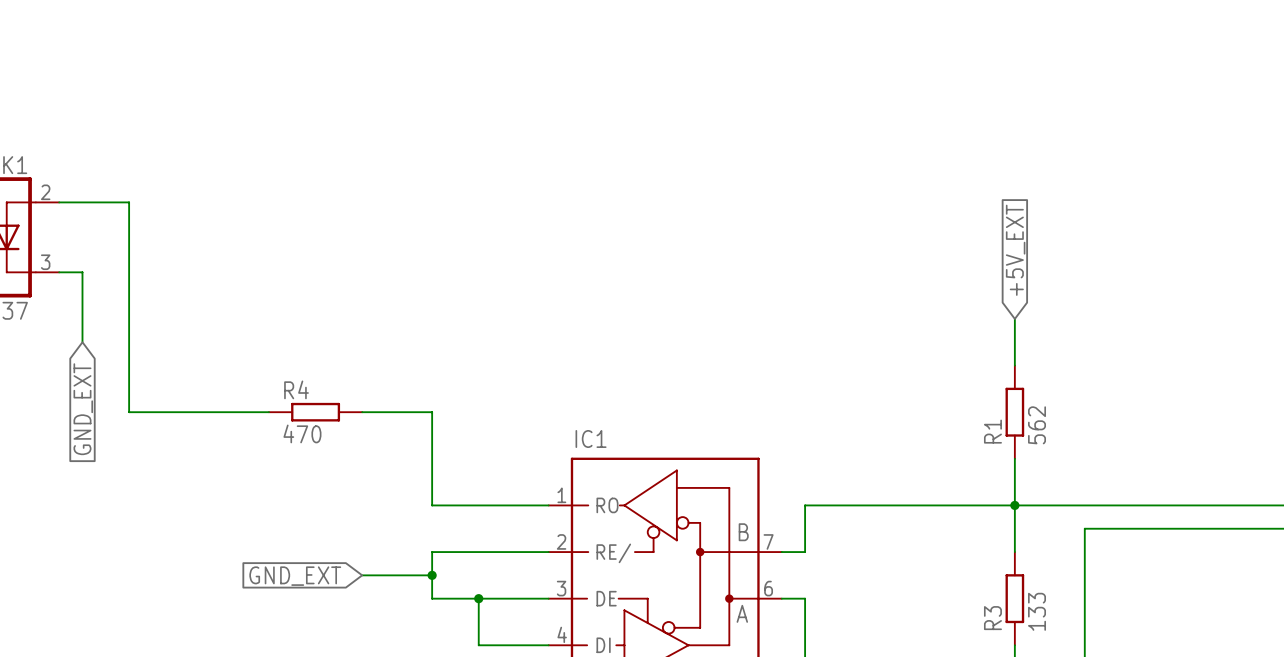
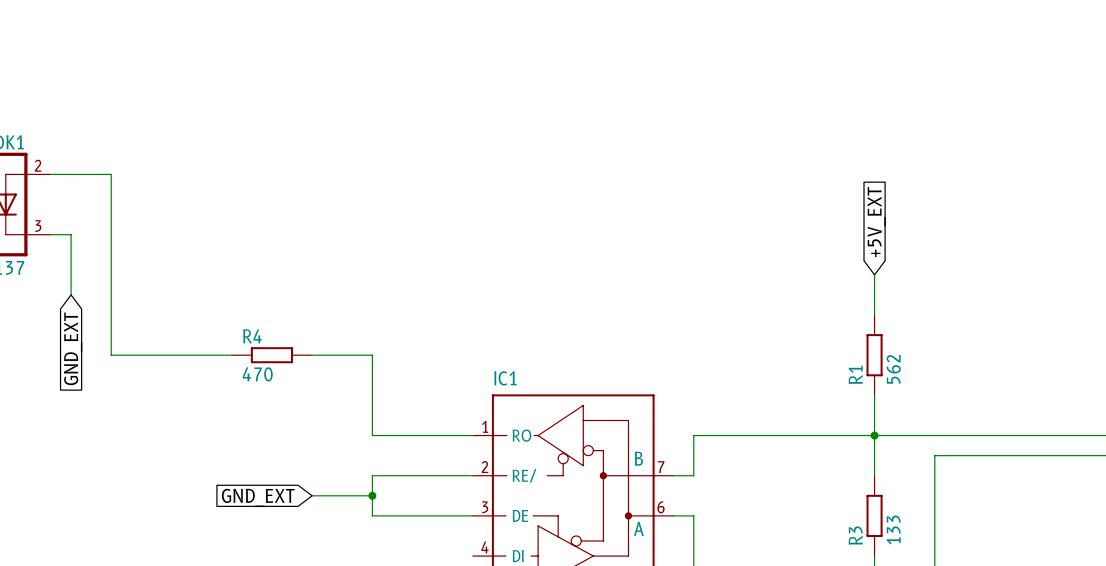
wire: (478, 598) (478, 645) (548, 645) -> none
junction: (478, 598) -> none

